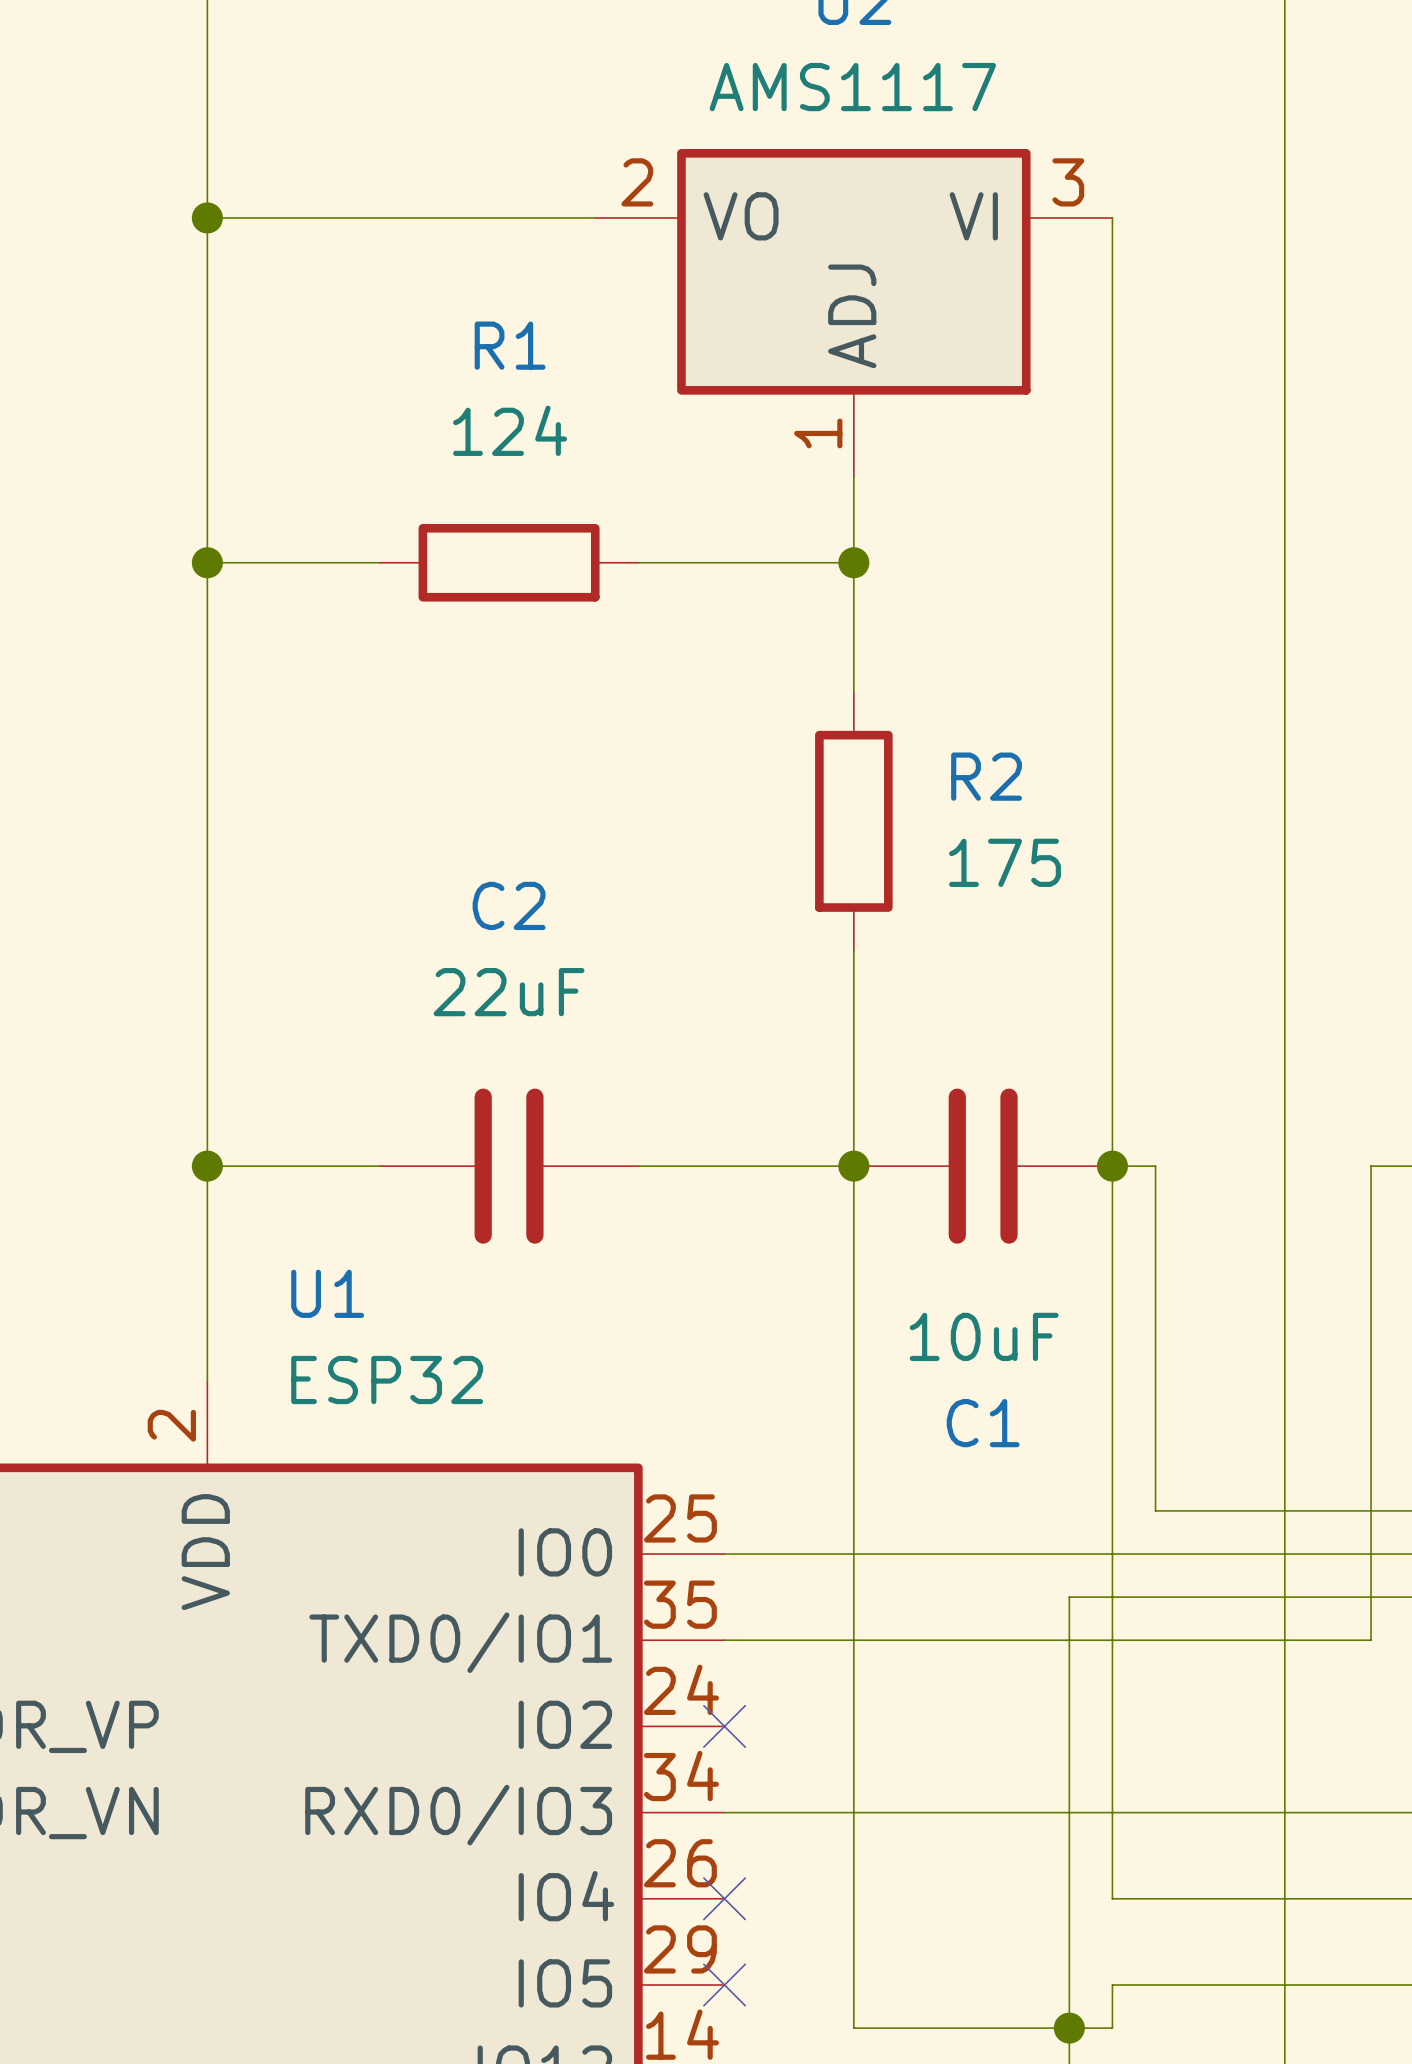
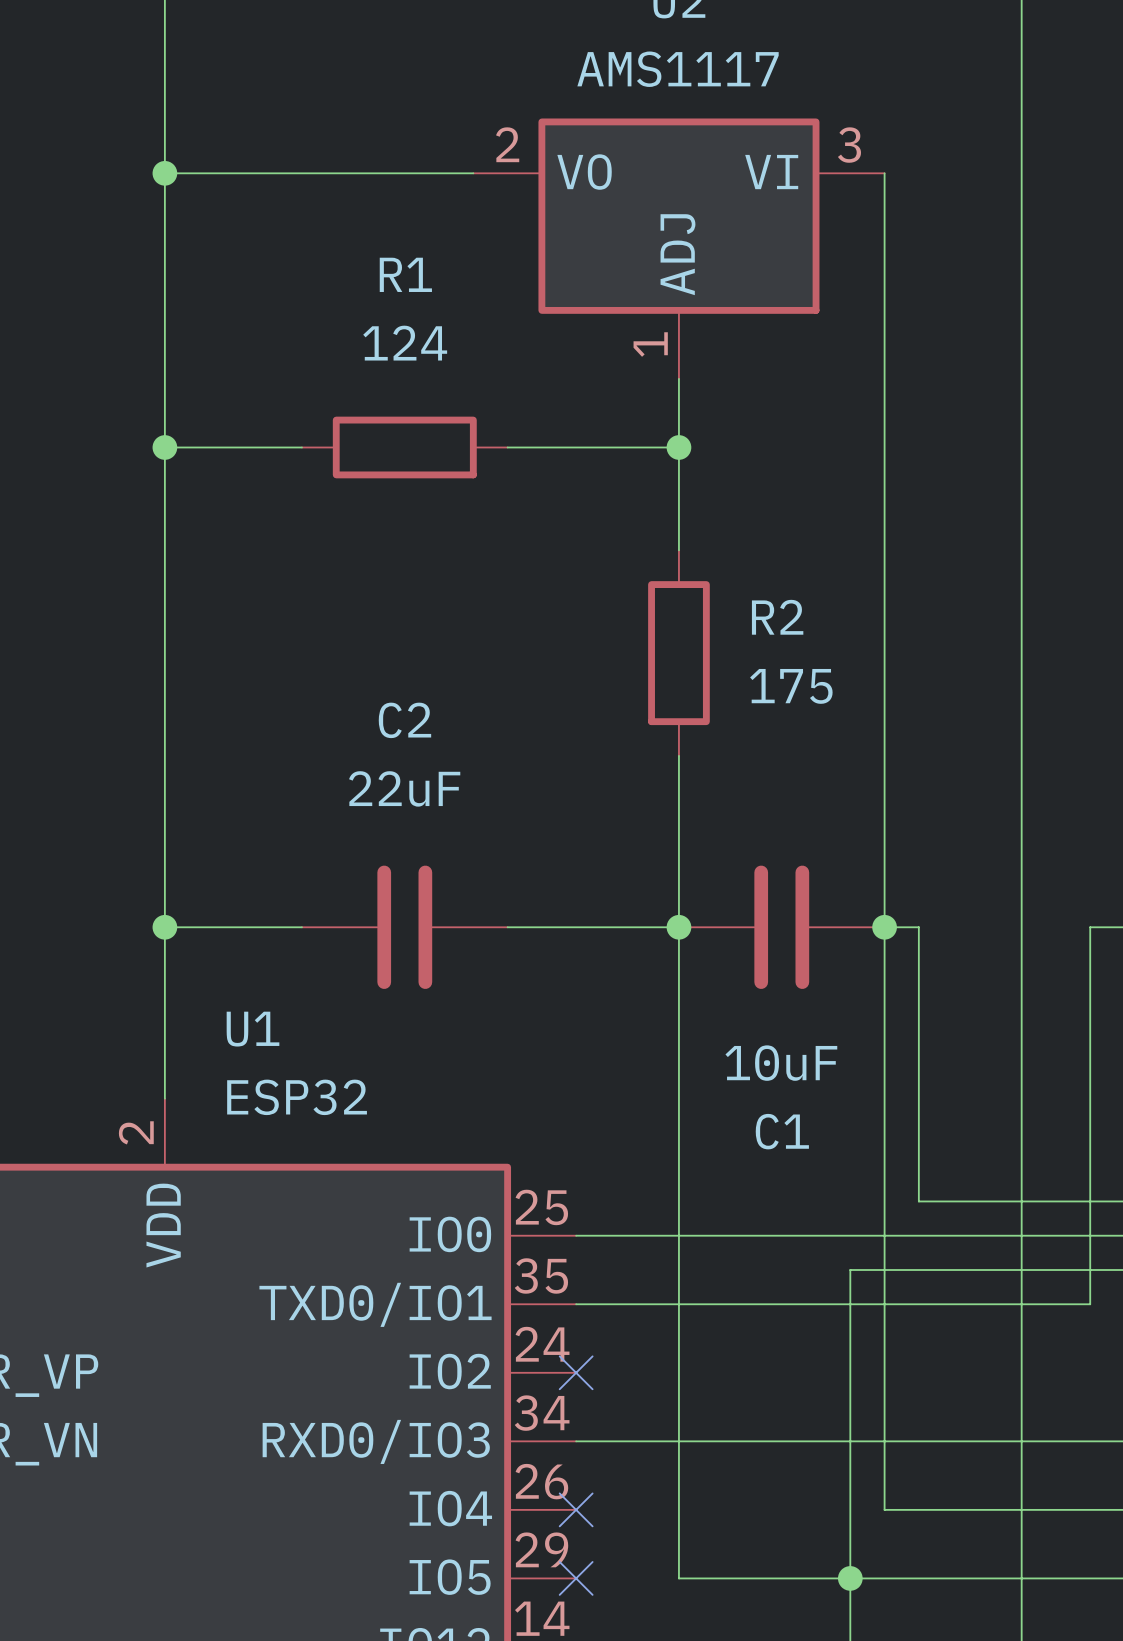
wire: (853, 1985) (853, 2028) (1112, 2028) (1112, 1985) -> (678, 1578) (884, 1578)
junction position: (1069, 2028) -> (850, 1578)

